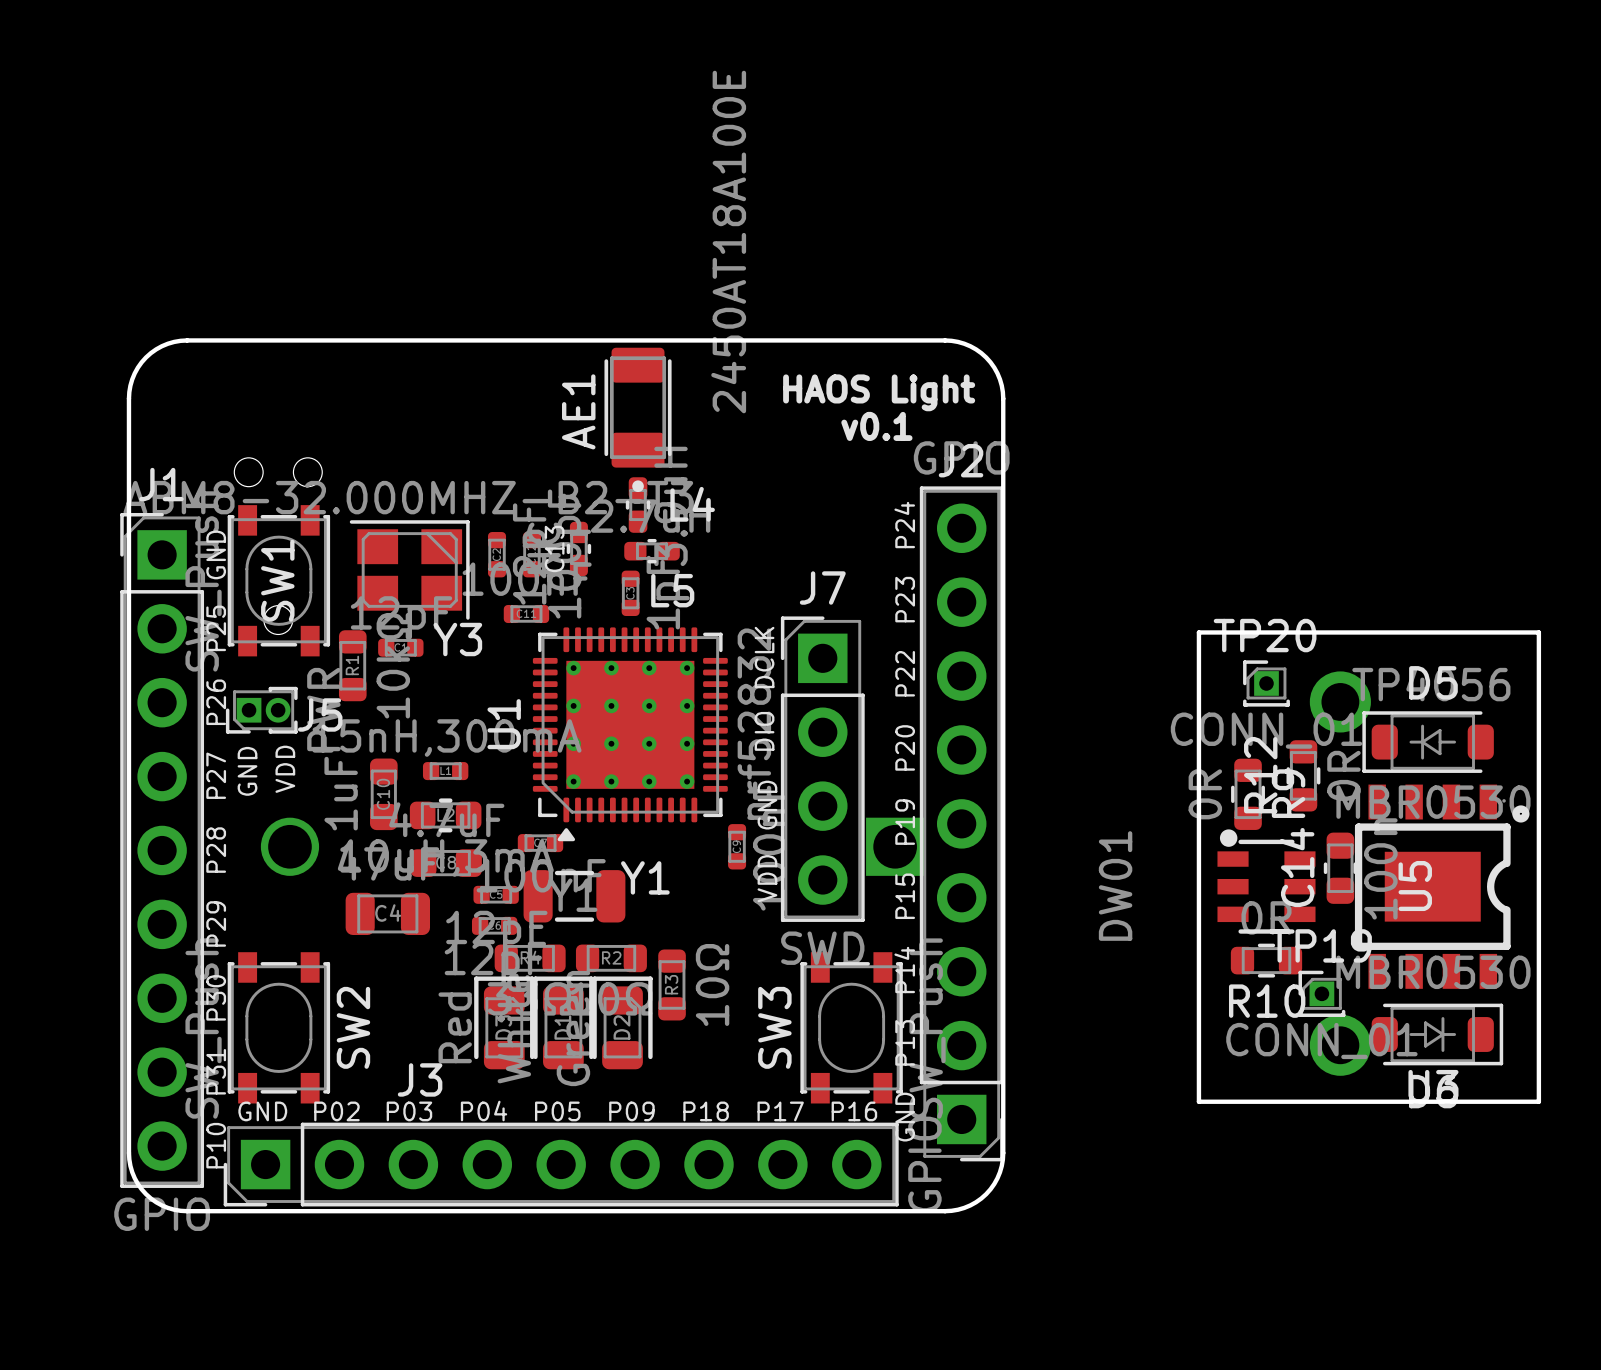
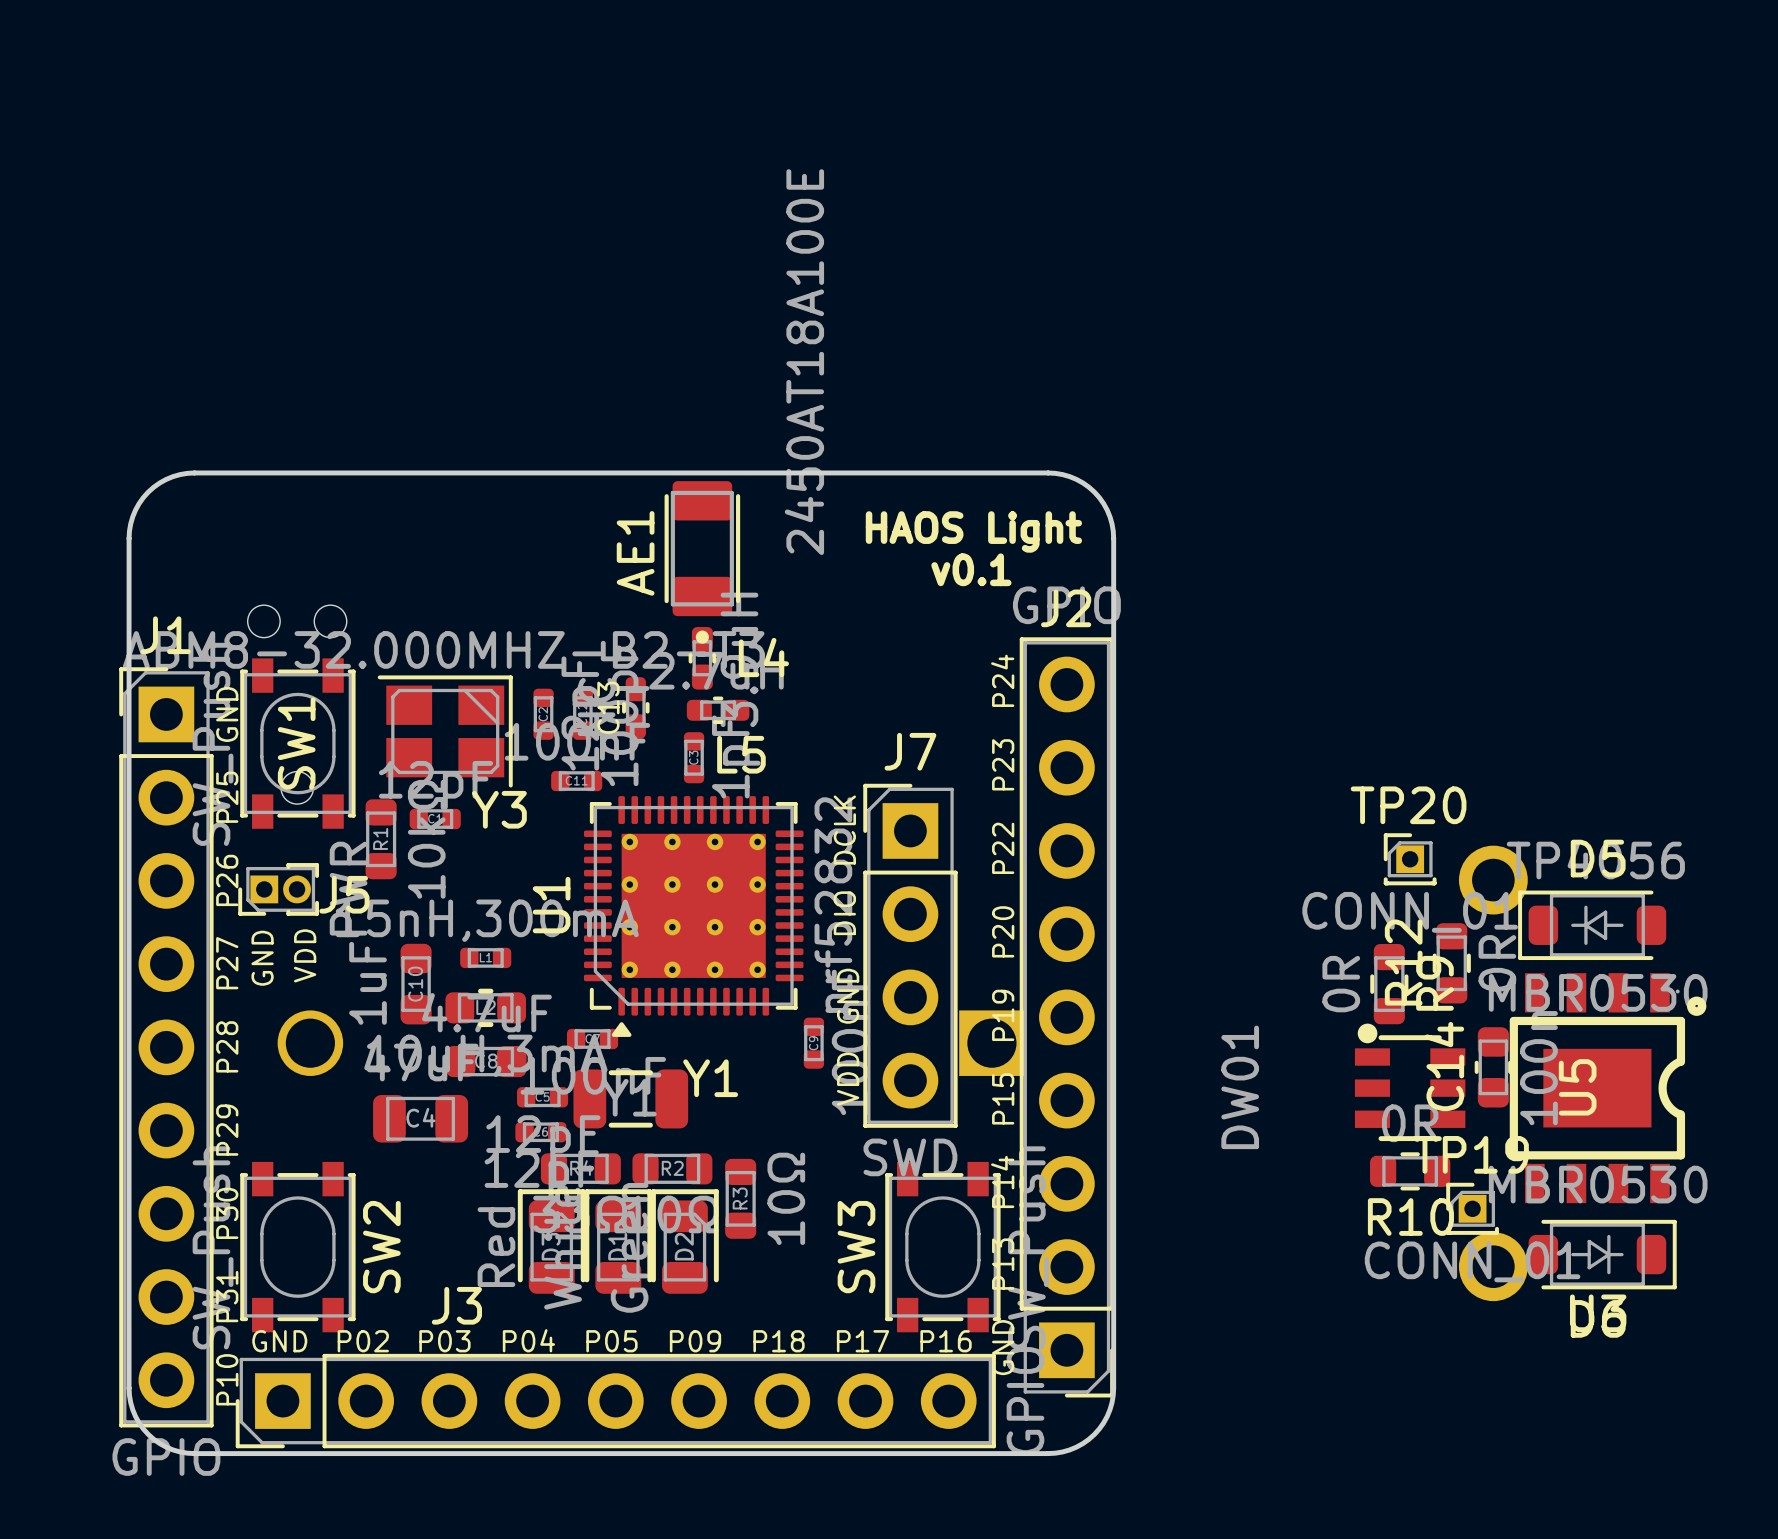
board edge: (1198, 632) (1538, 632) (1538, 1101) (1198, 1101) (1198, 632) -> none

